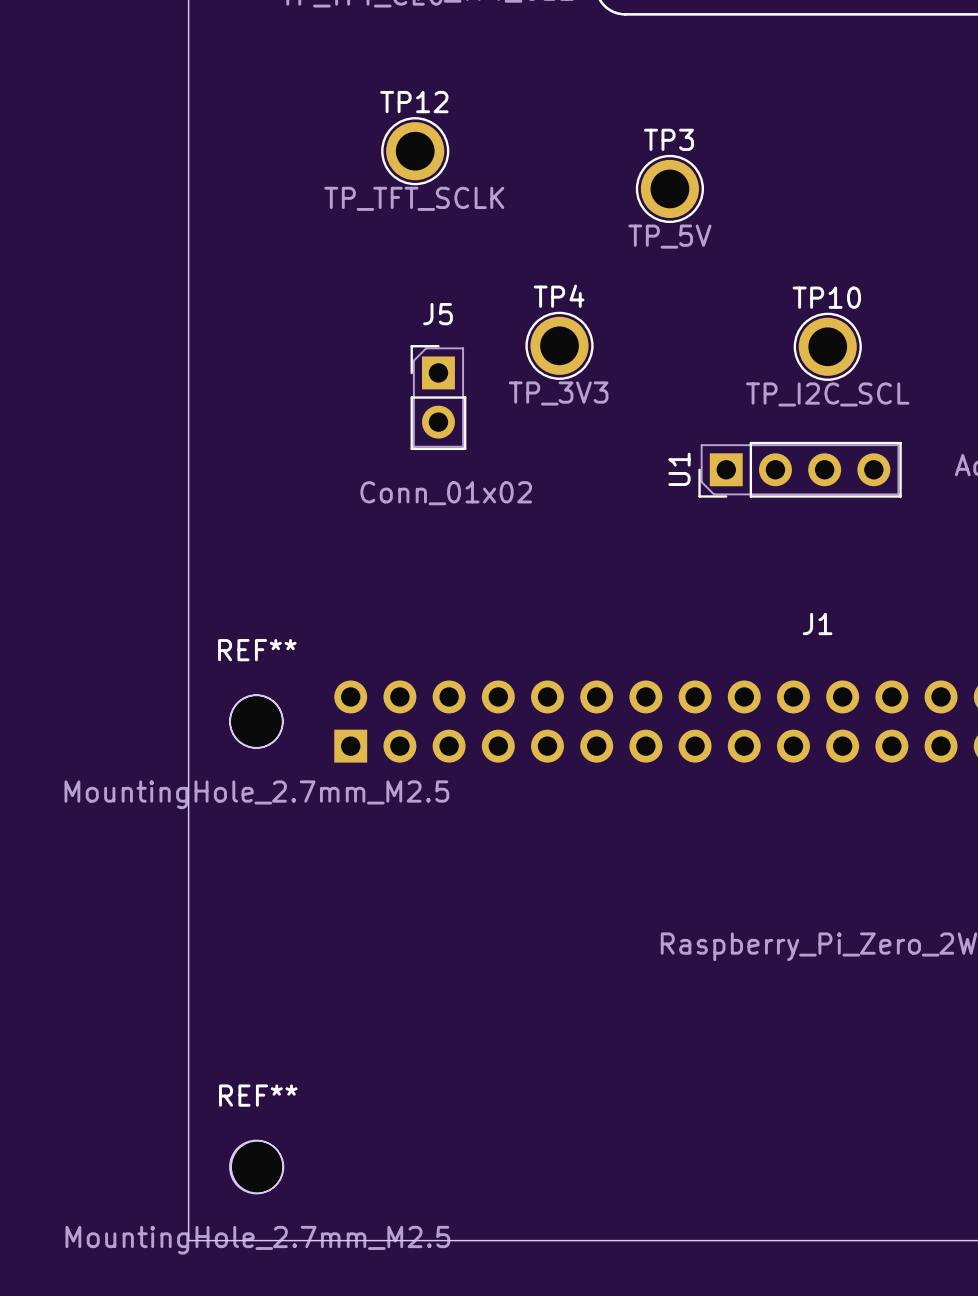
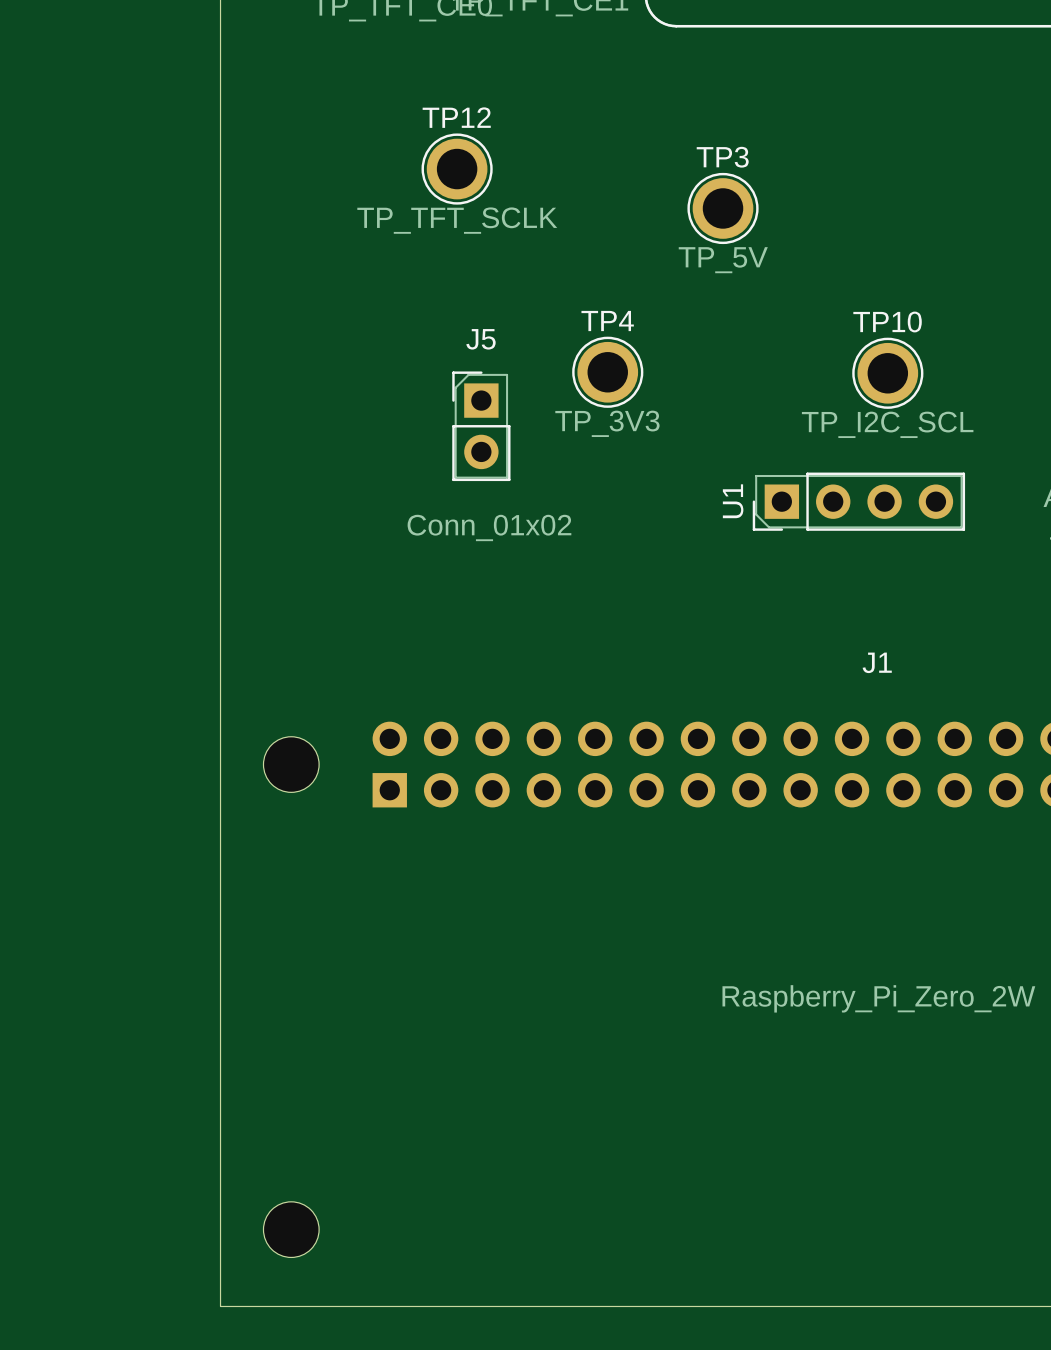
REF**: MountingHole_2.7mm_M2.5 (256, 721) -> none
REF**: MountingHole_2.7mm_M2.5 (257, 1167) -> none

